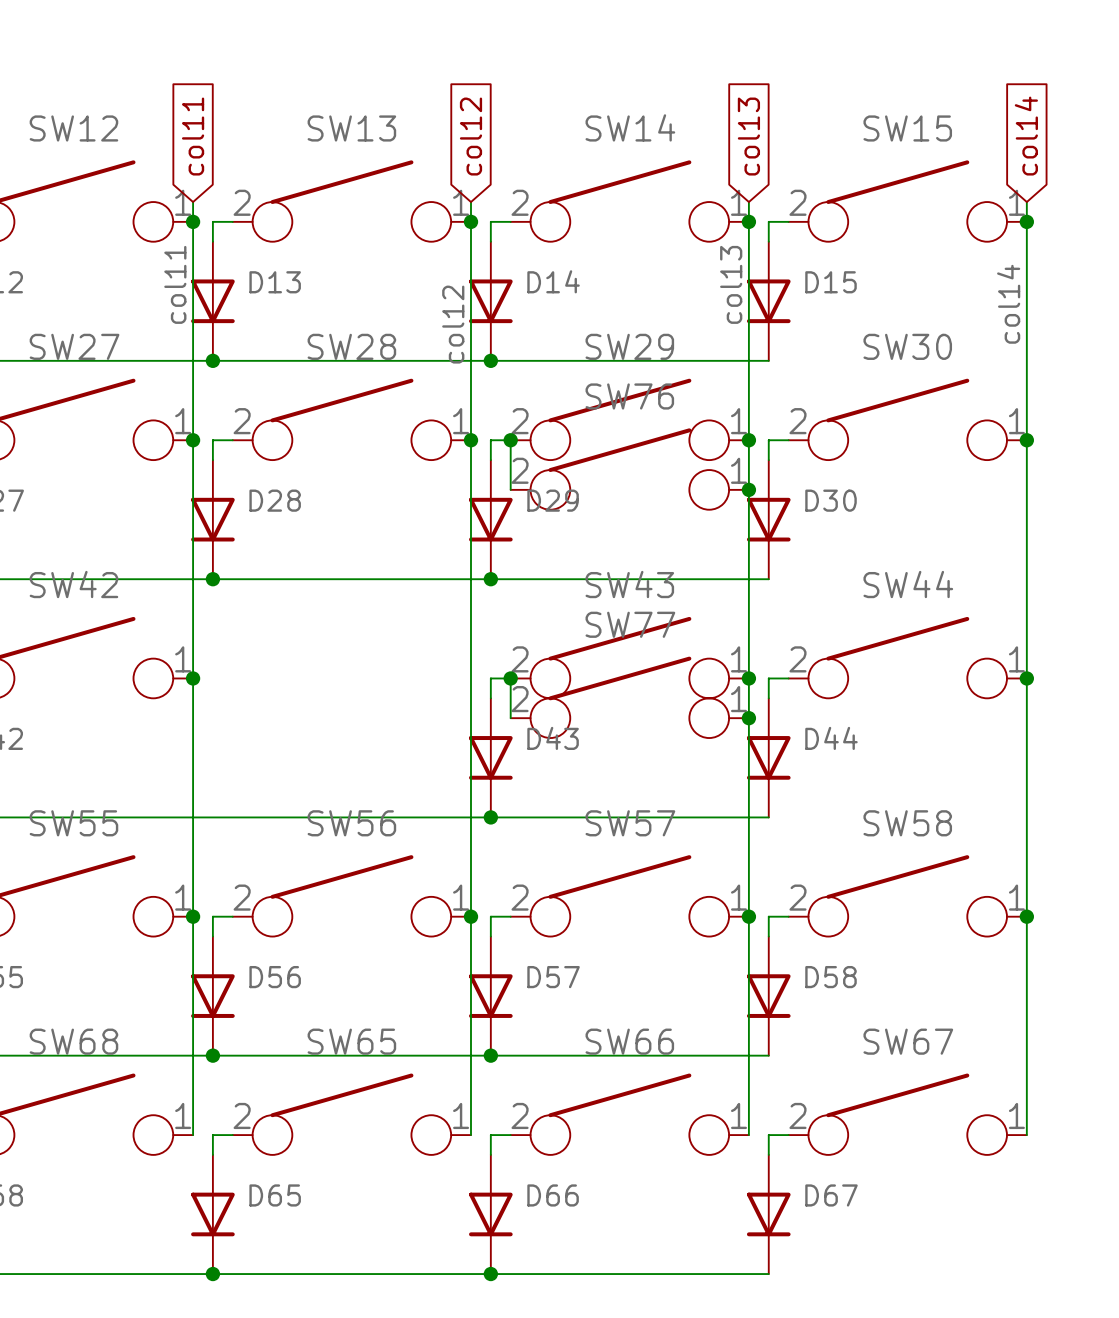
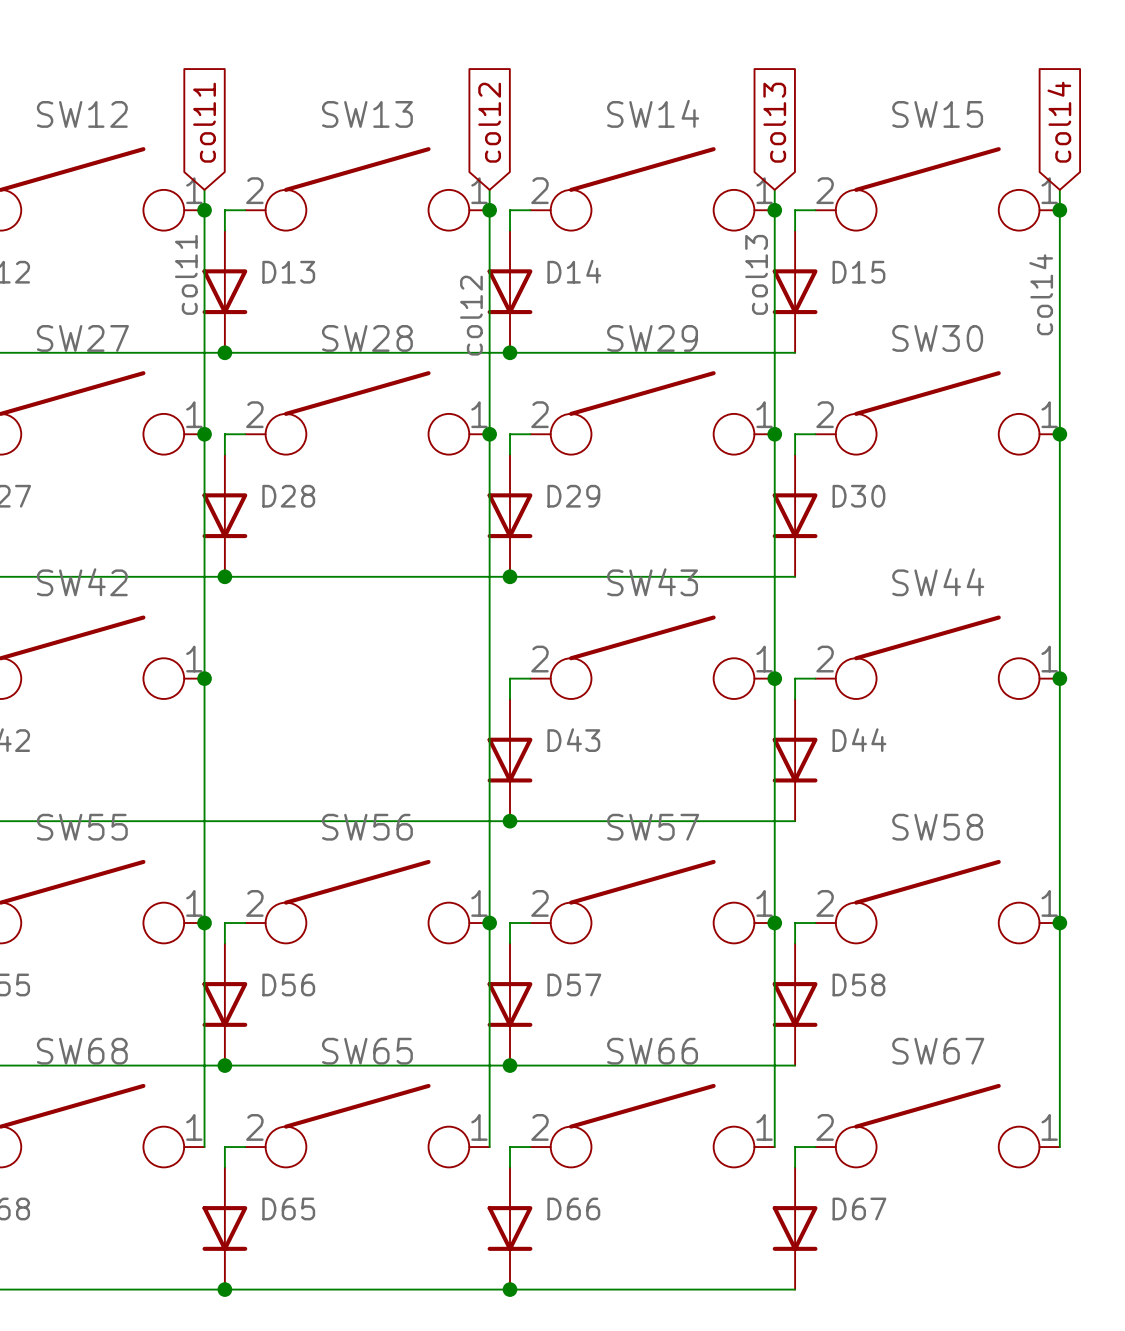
wire: (510, 440) (510, 489) -> none
junction: (510, 440) -> none
SW76: (629, 469) -> none
junction: (748, 489) -> none
wire: (510, 678) (510, 718) -> none
junction: (510, 678) -> none
SW77: (629, 697) -> none
junction: (748, 718) -> none

